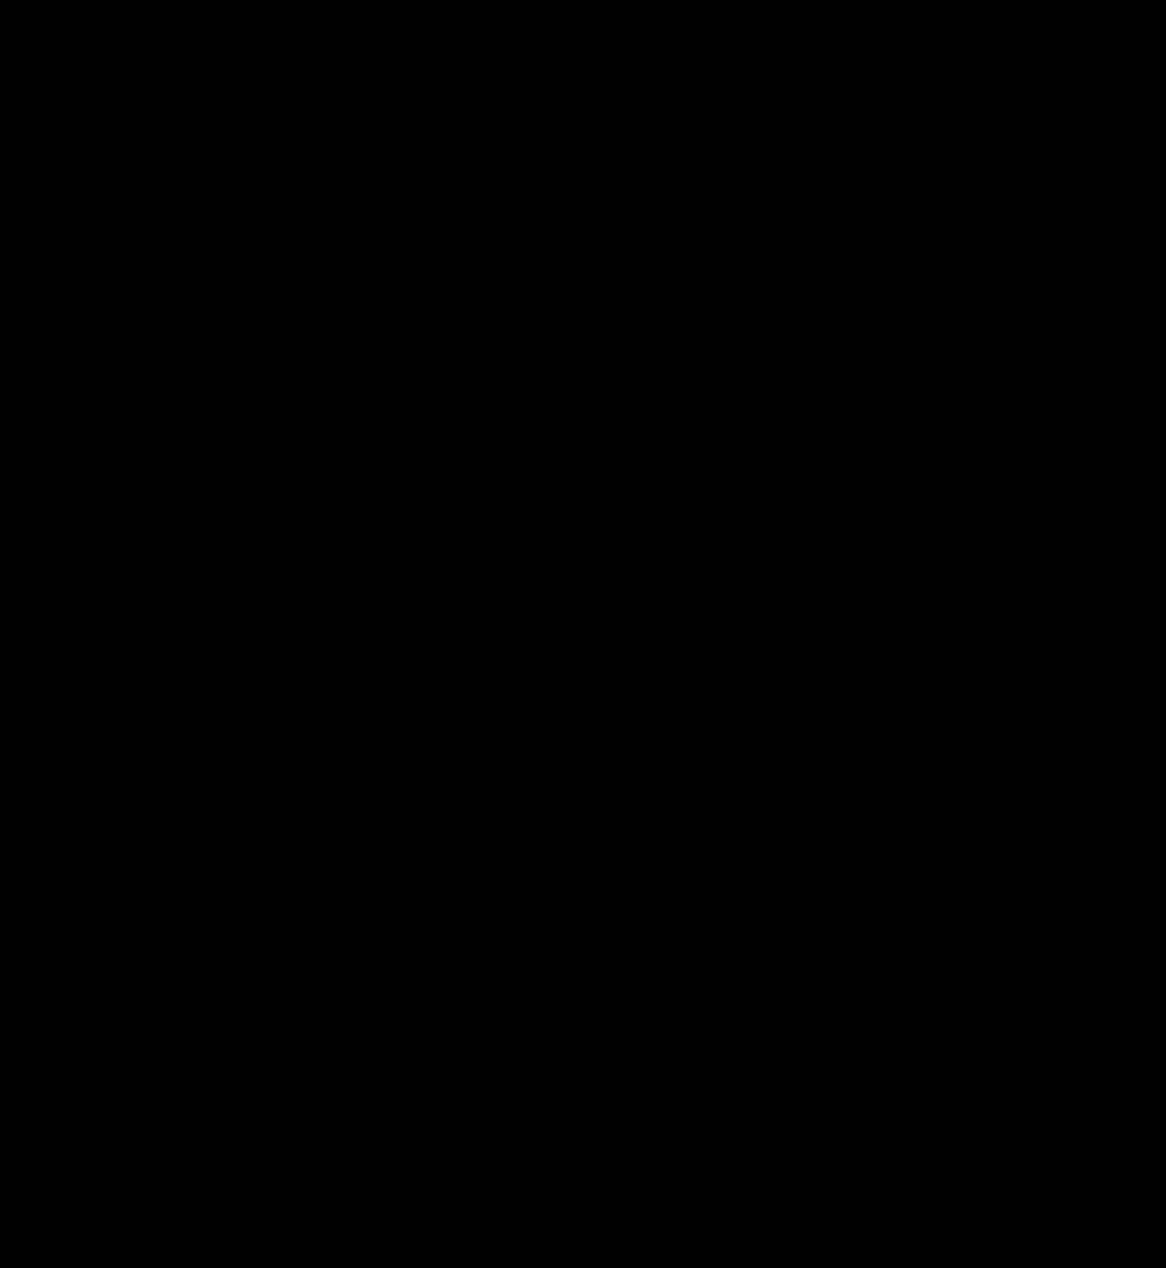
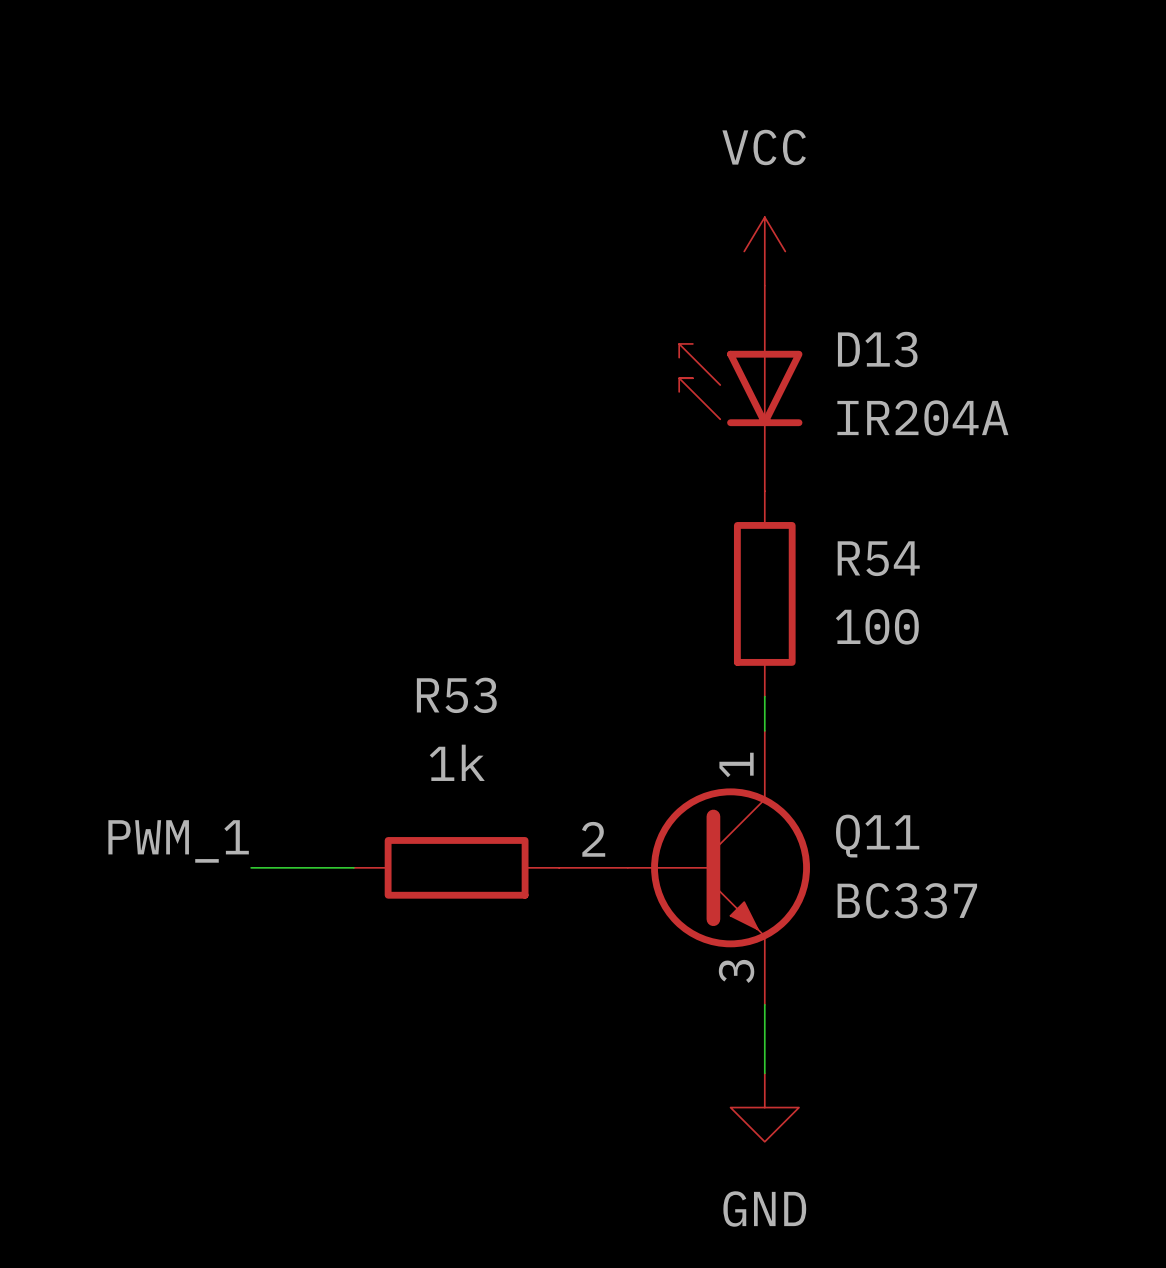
power symbol: none -> VCC (764, 251)
D13: none -> IR204A (740, 388)
R54: none -> 100 (764, 593)
wire: none -> (764, 696) (764, 730)
label: none -> PWM_1 (178, 841)
wire: none -> (251, 867) (353, 867)
R53: none -> 1k (456, 867)
Q11: none -> BC337 (684, 867)
wire: none -> (764, 1004) (764, 1073)
power symbol: none -> GND (764, 1107)

